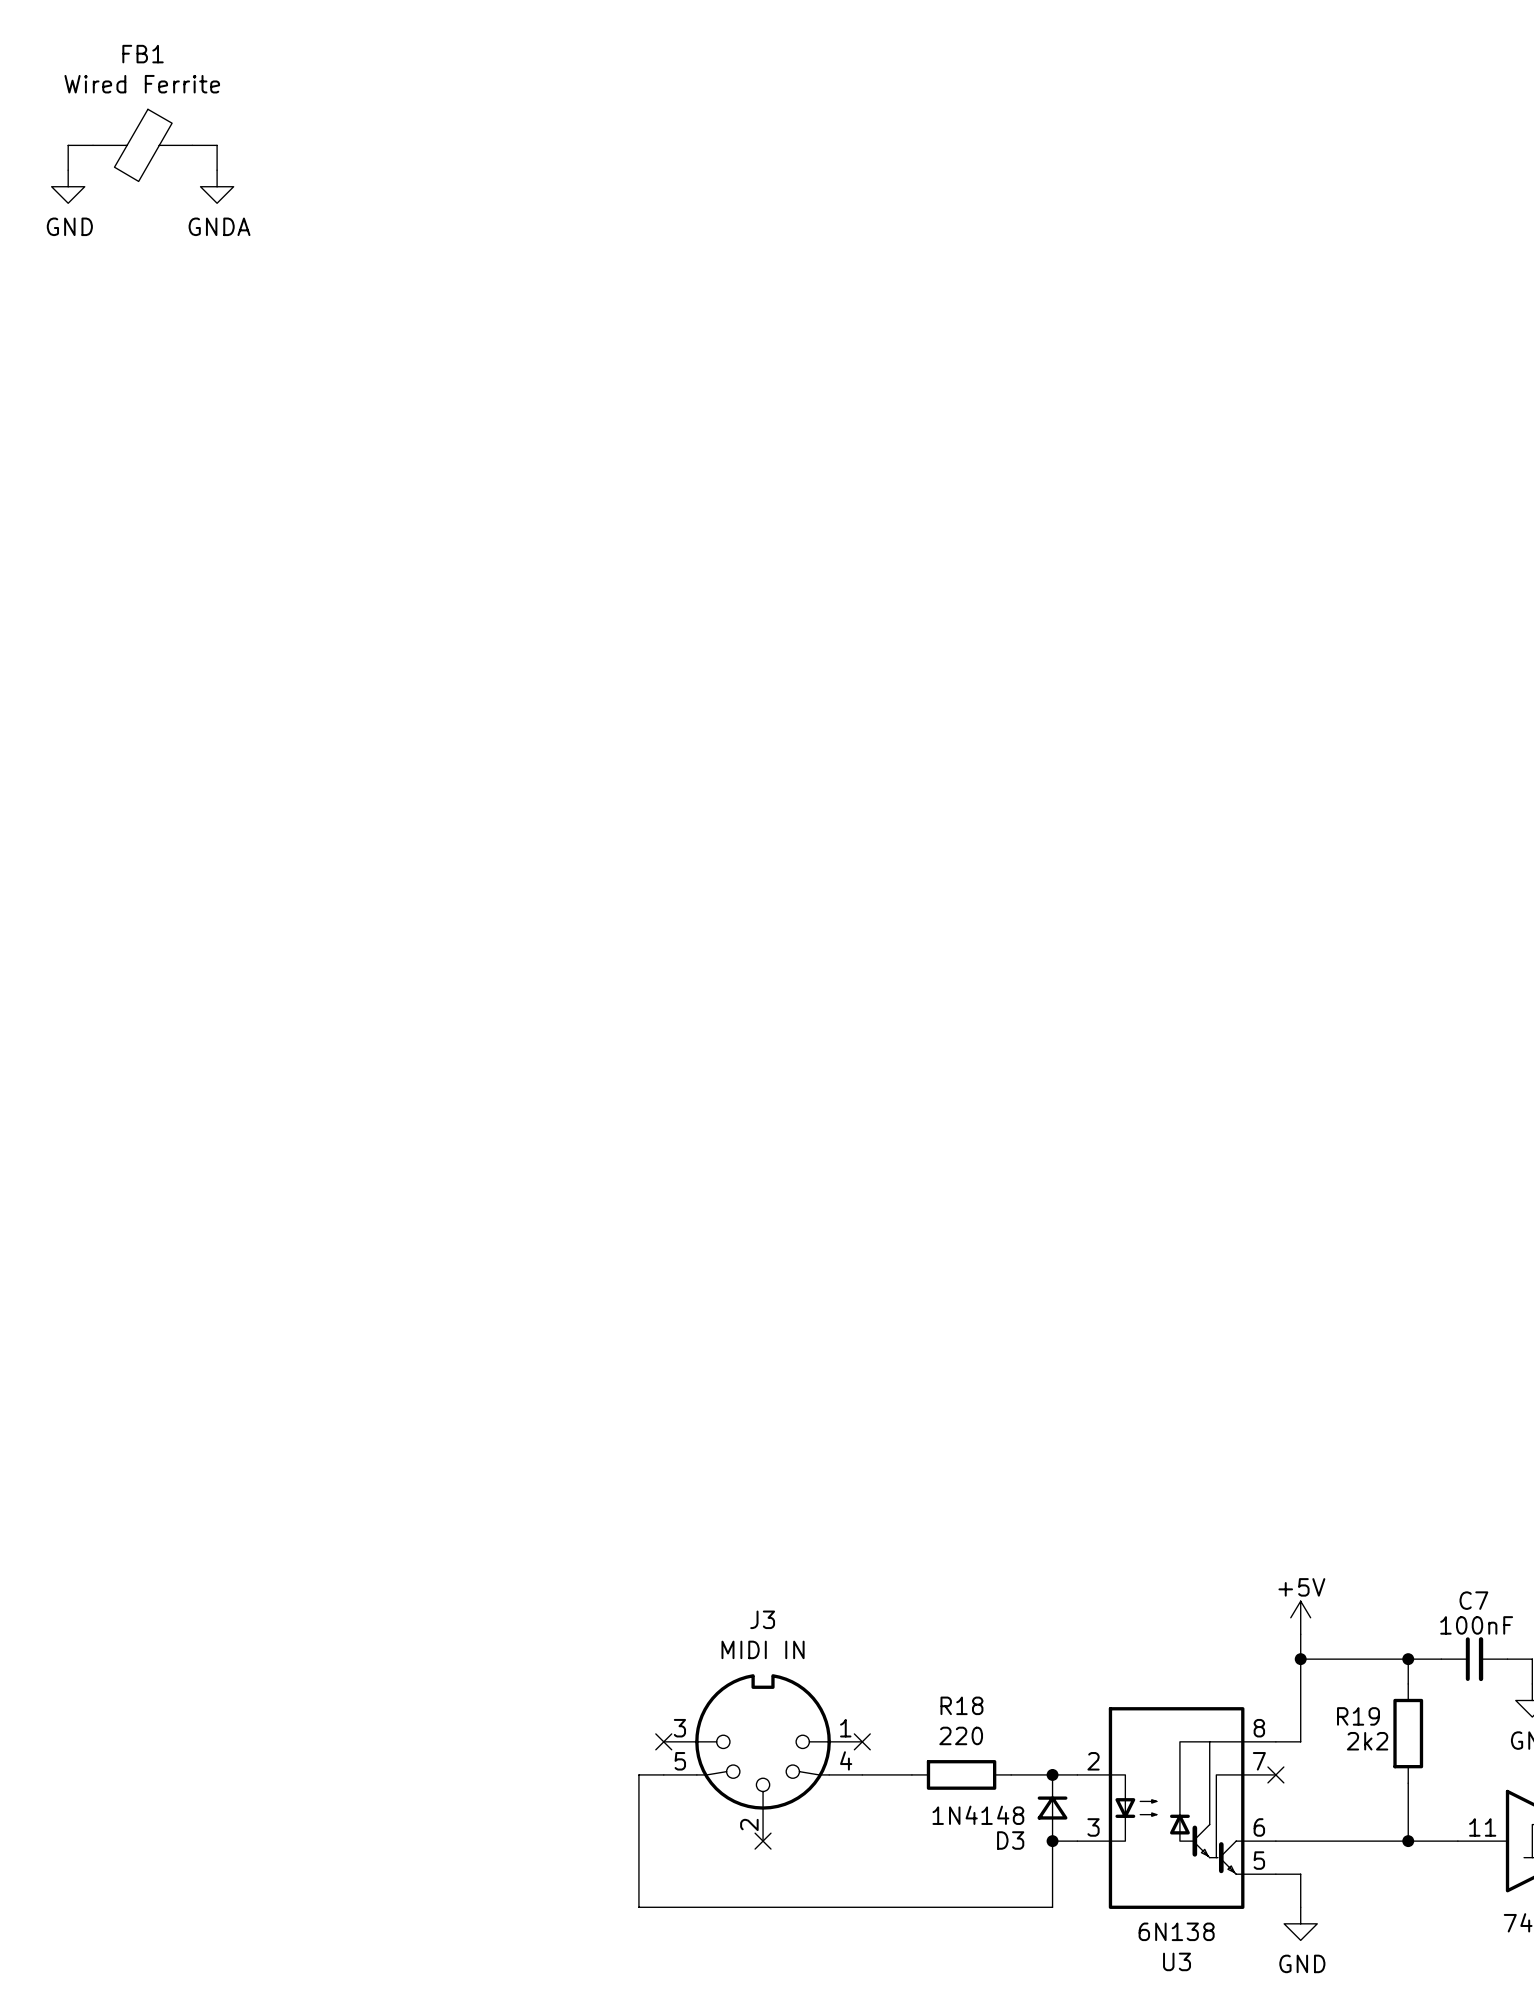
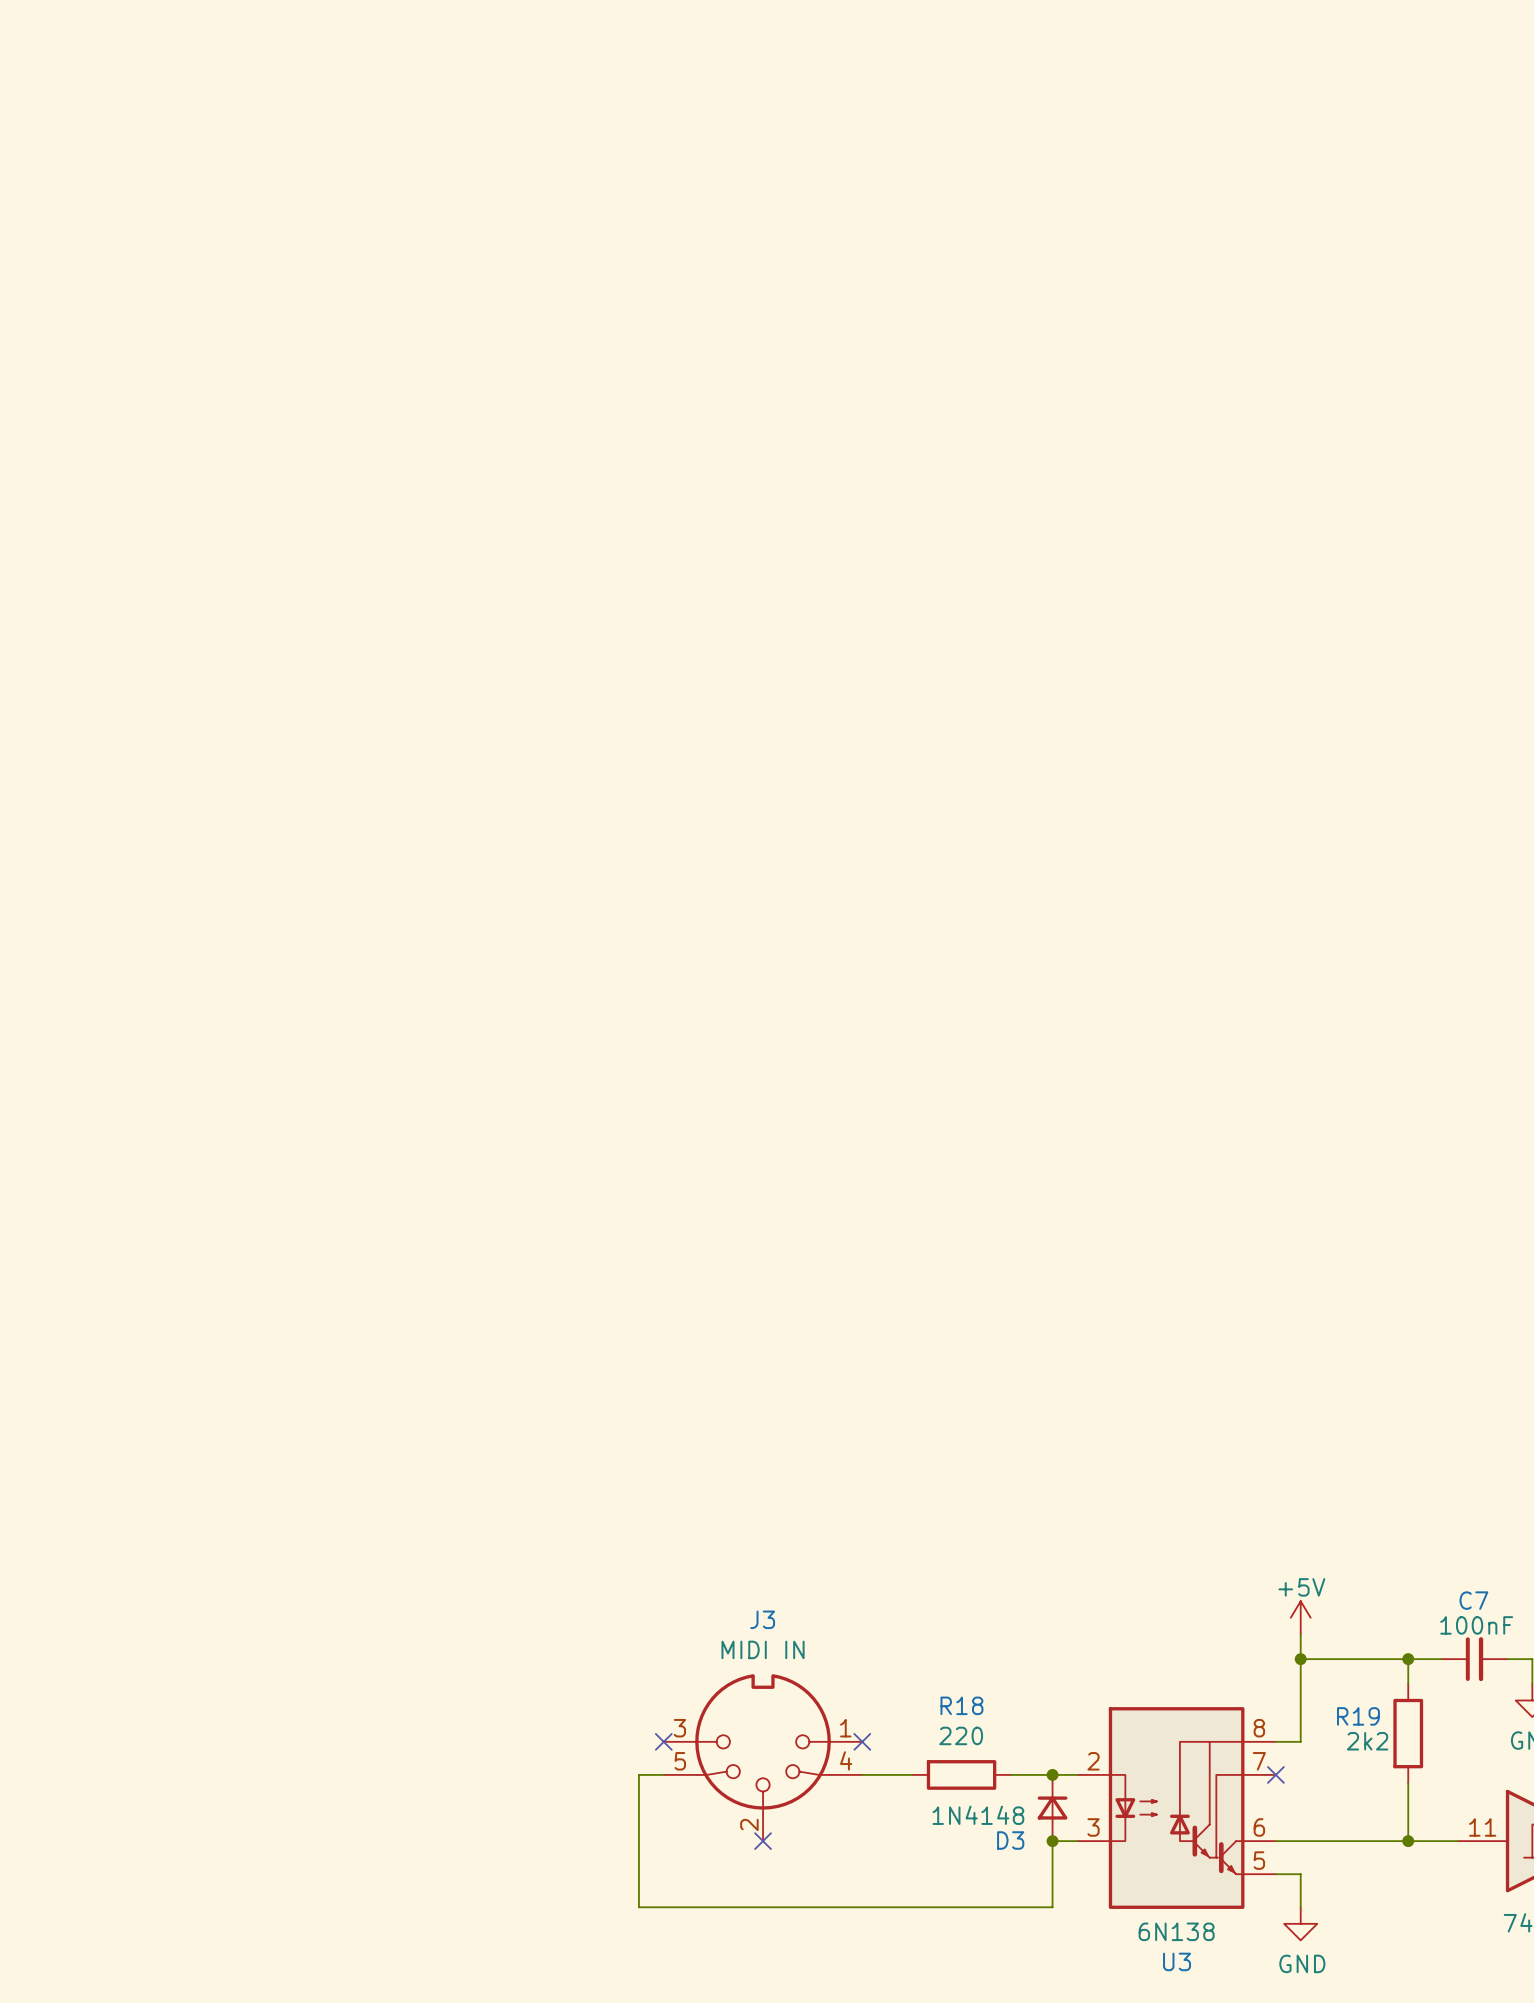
wire: (93, 145) (68, 145) (68, 170) -> none
FB1: Wired Ferrite (142, 145) -> none
wire: (192, 145) (217, 145) (217, 170) -> none
power symbol: GND (68, 186) -> none
power symbol: GNDA (217, 186) -> none

